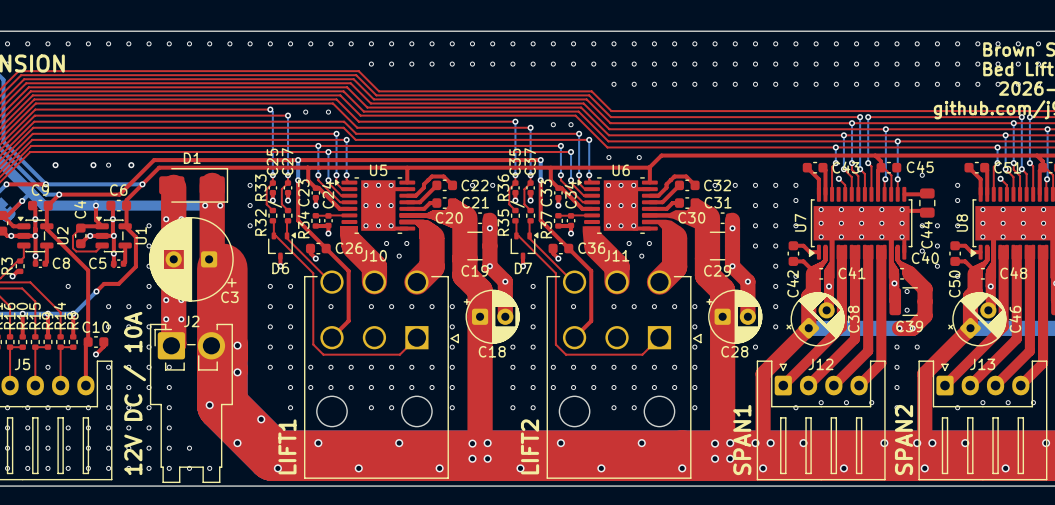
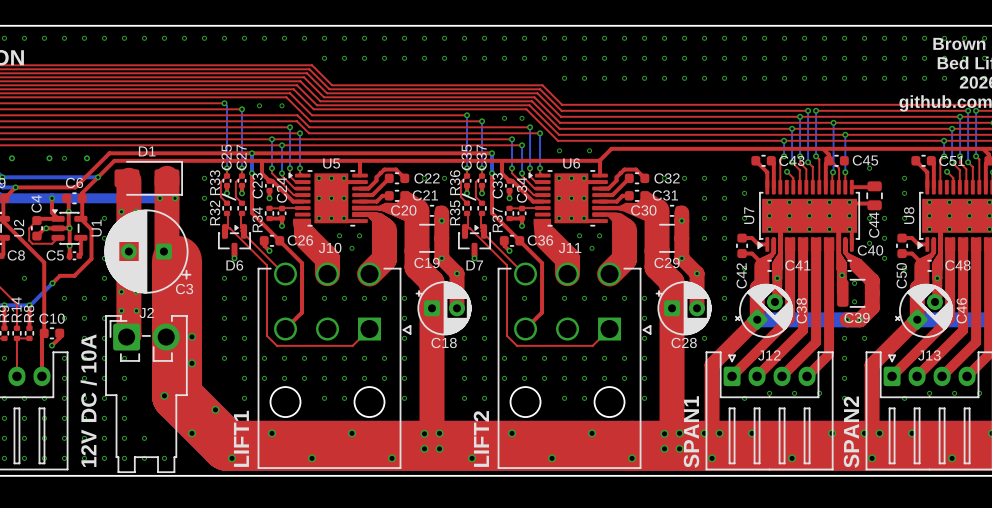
D6 footprint: [268, 232, 296, 260] -> [218, 224, 251, 258]
D7 footprint: [510, 232, 539, 260] -> [458, 224, 491, 258]

